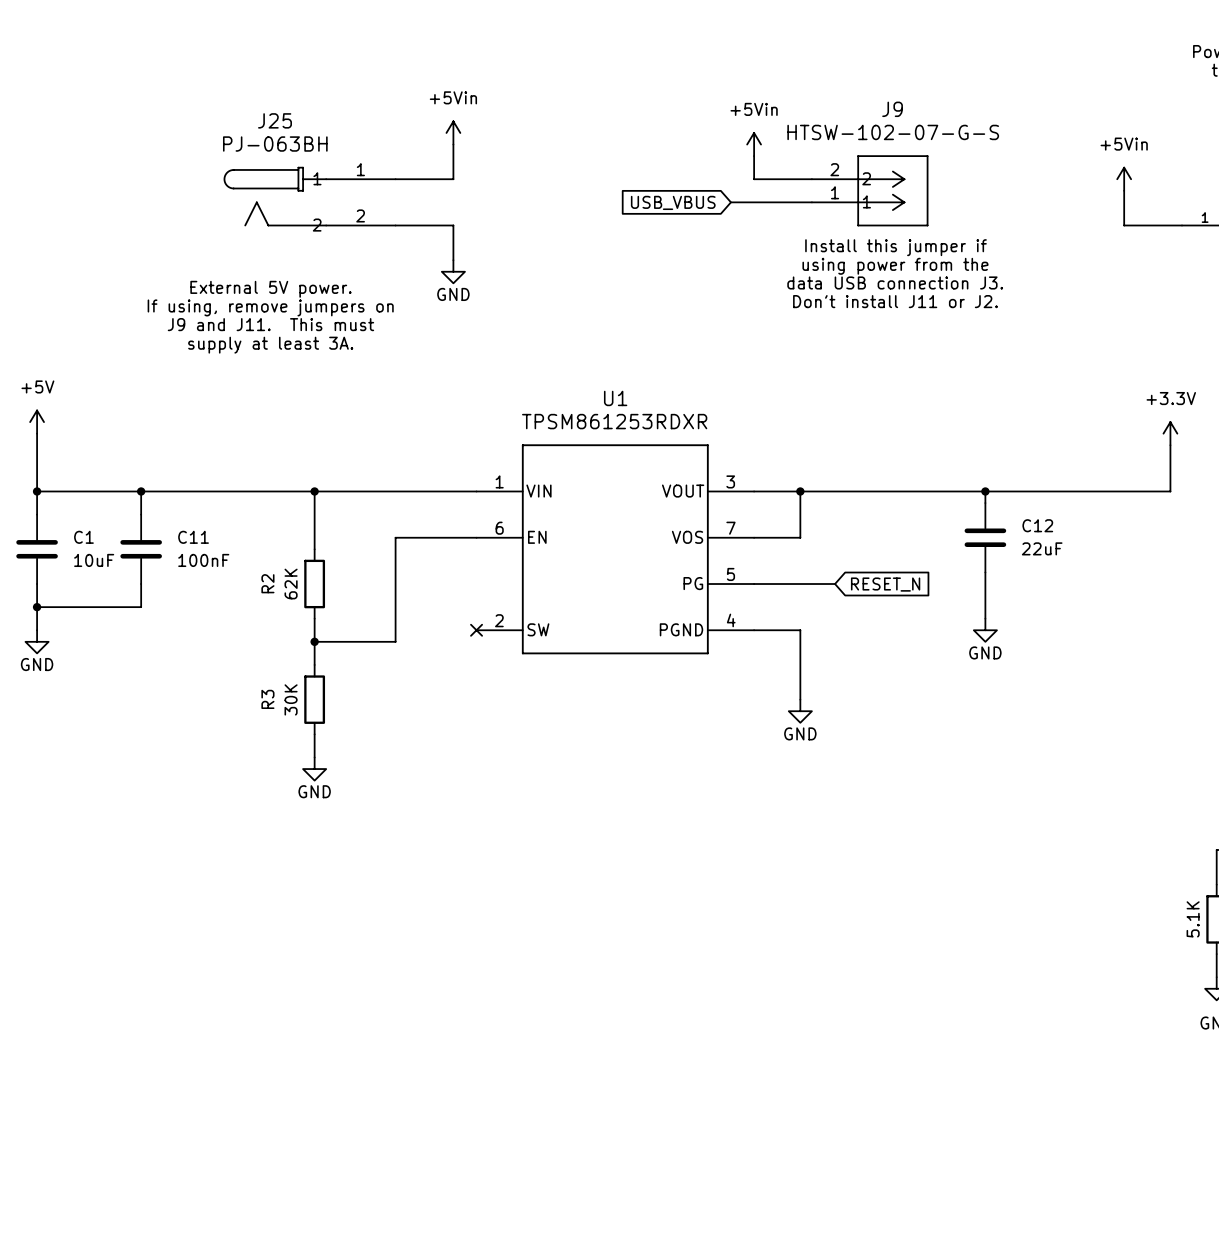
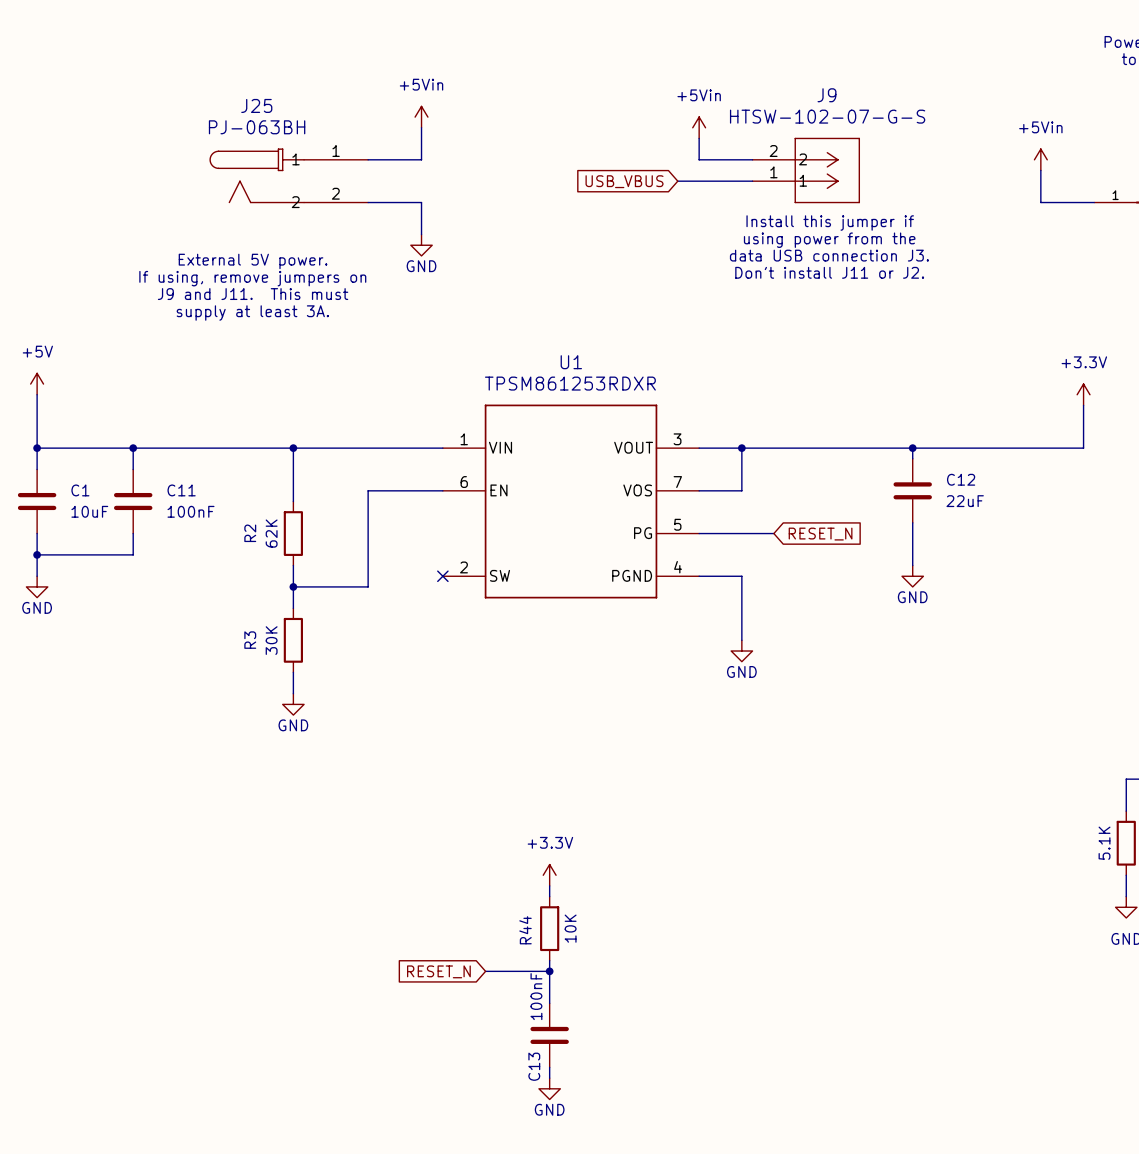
power symbol: none -> +3.3V (549, 875)
wire: none -> (549, 885) (549, 896)
R44: none -> 10K (549, 928)
wire: none -> (549, 960) (549, 1003)
global label: none -> RESET_N (438, 971)
wire: none -> (485, 971) (549, 971)
junction: none -> (549, 971)
C13: none -> 100nF (549, 1035)
wire: none -> (549, 1067) (549, 1078)
power symbol: none -> GND (549, 1088)

